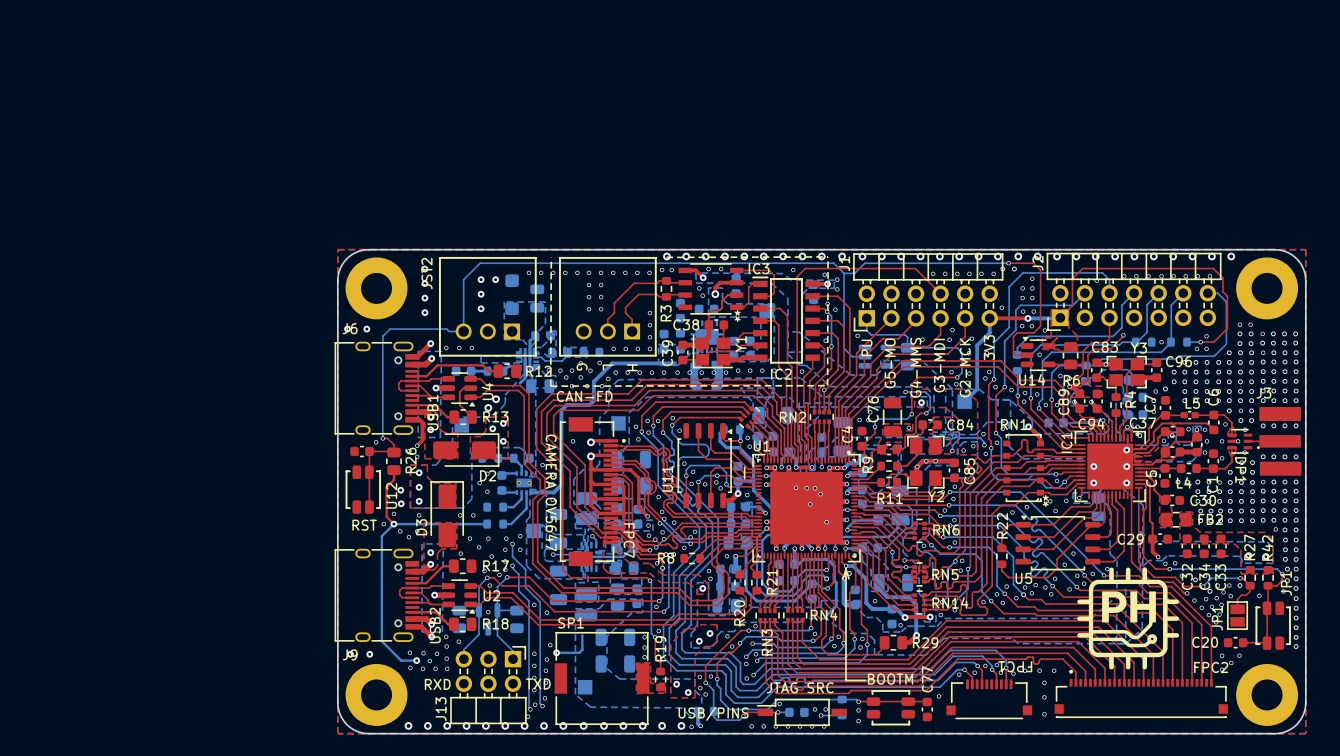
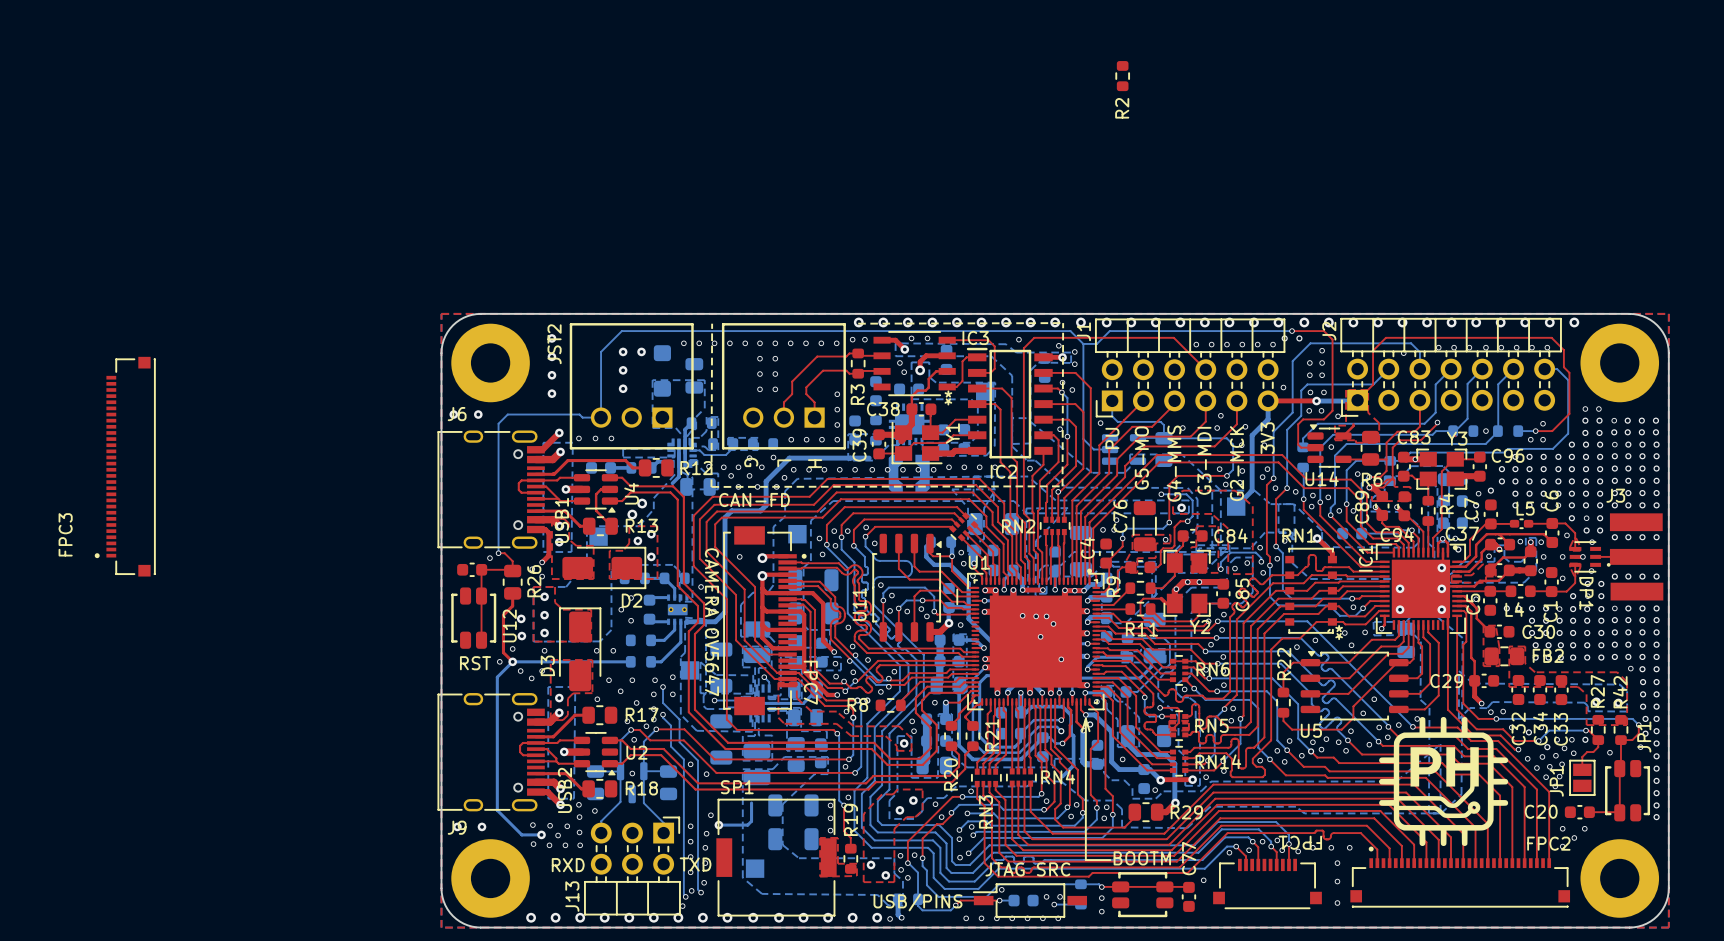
R2: none -> (1122, 76)
FPC3: none -> (125, 466)

